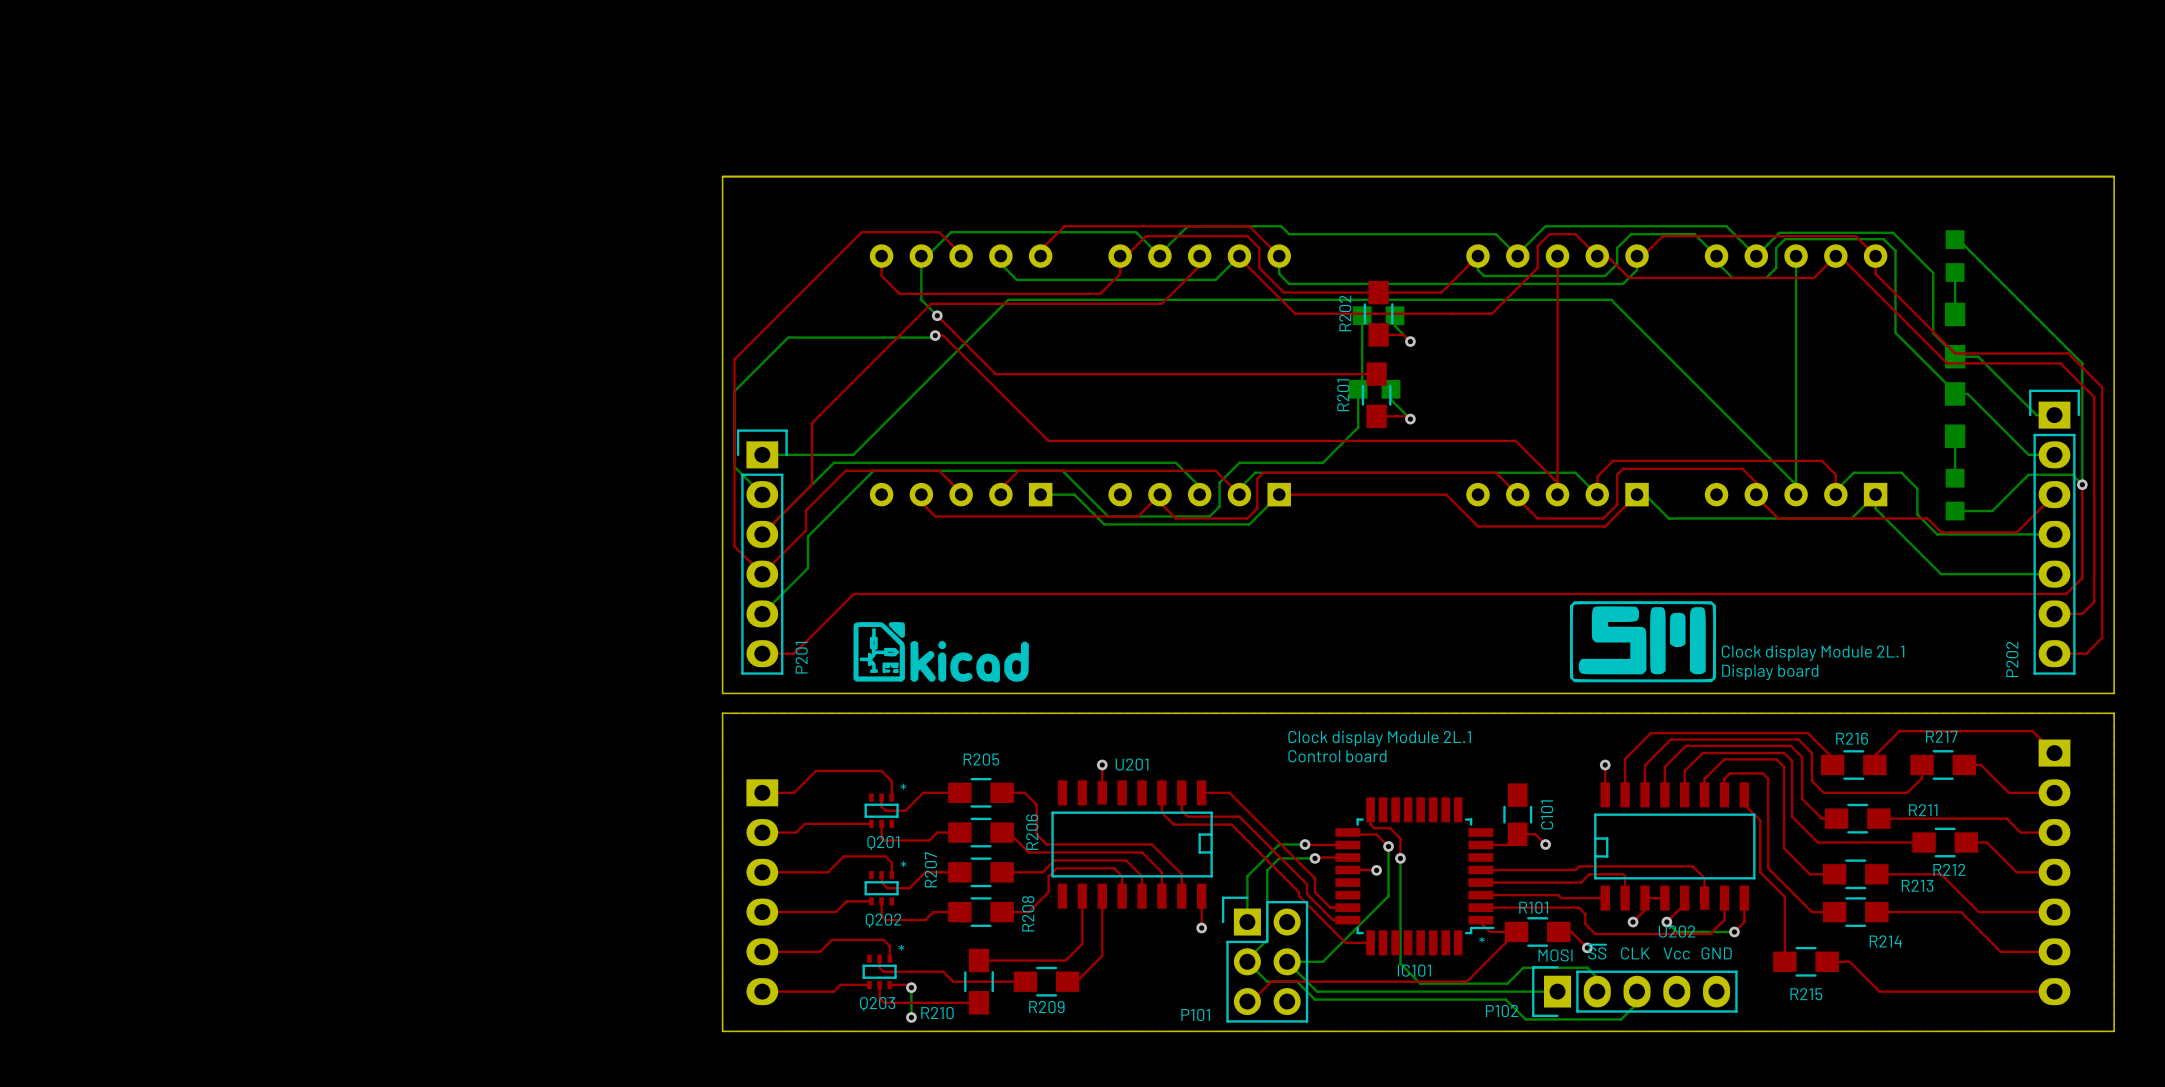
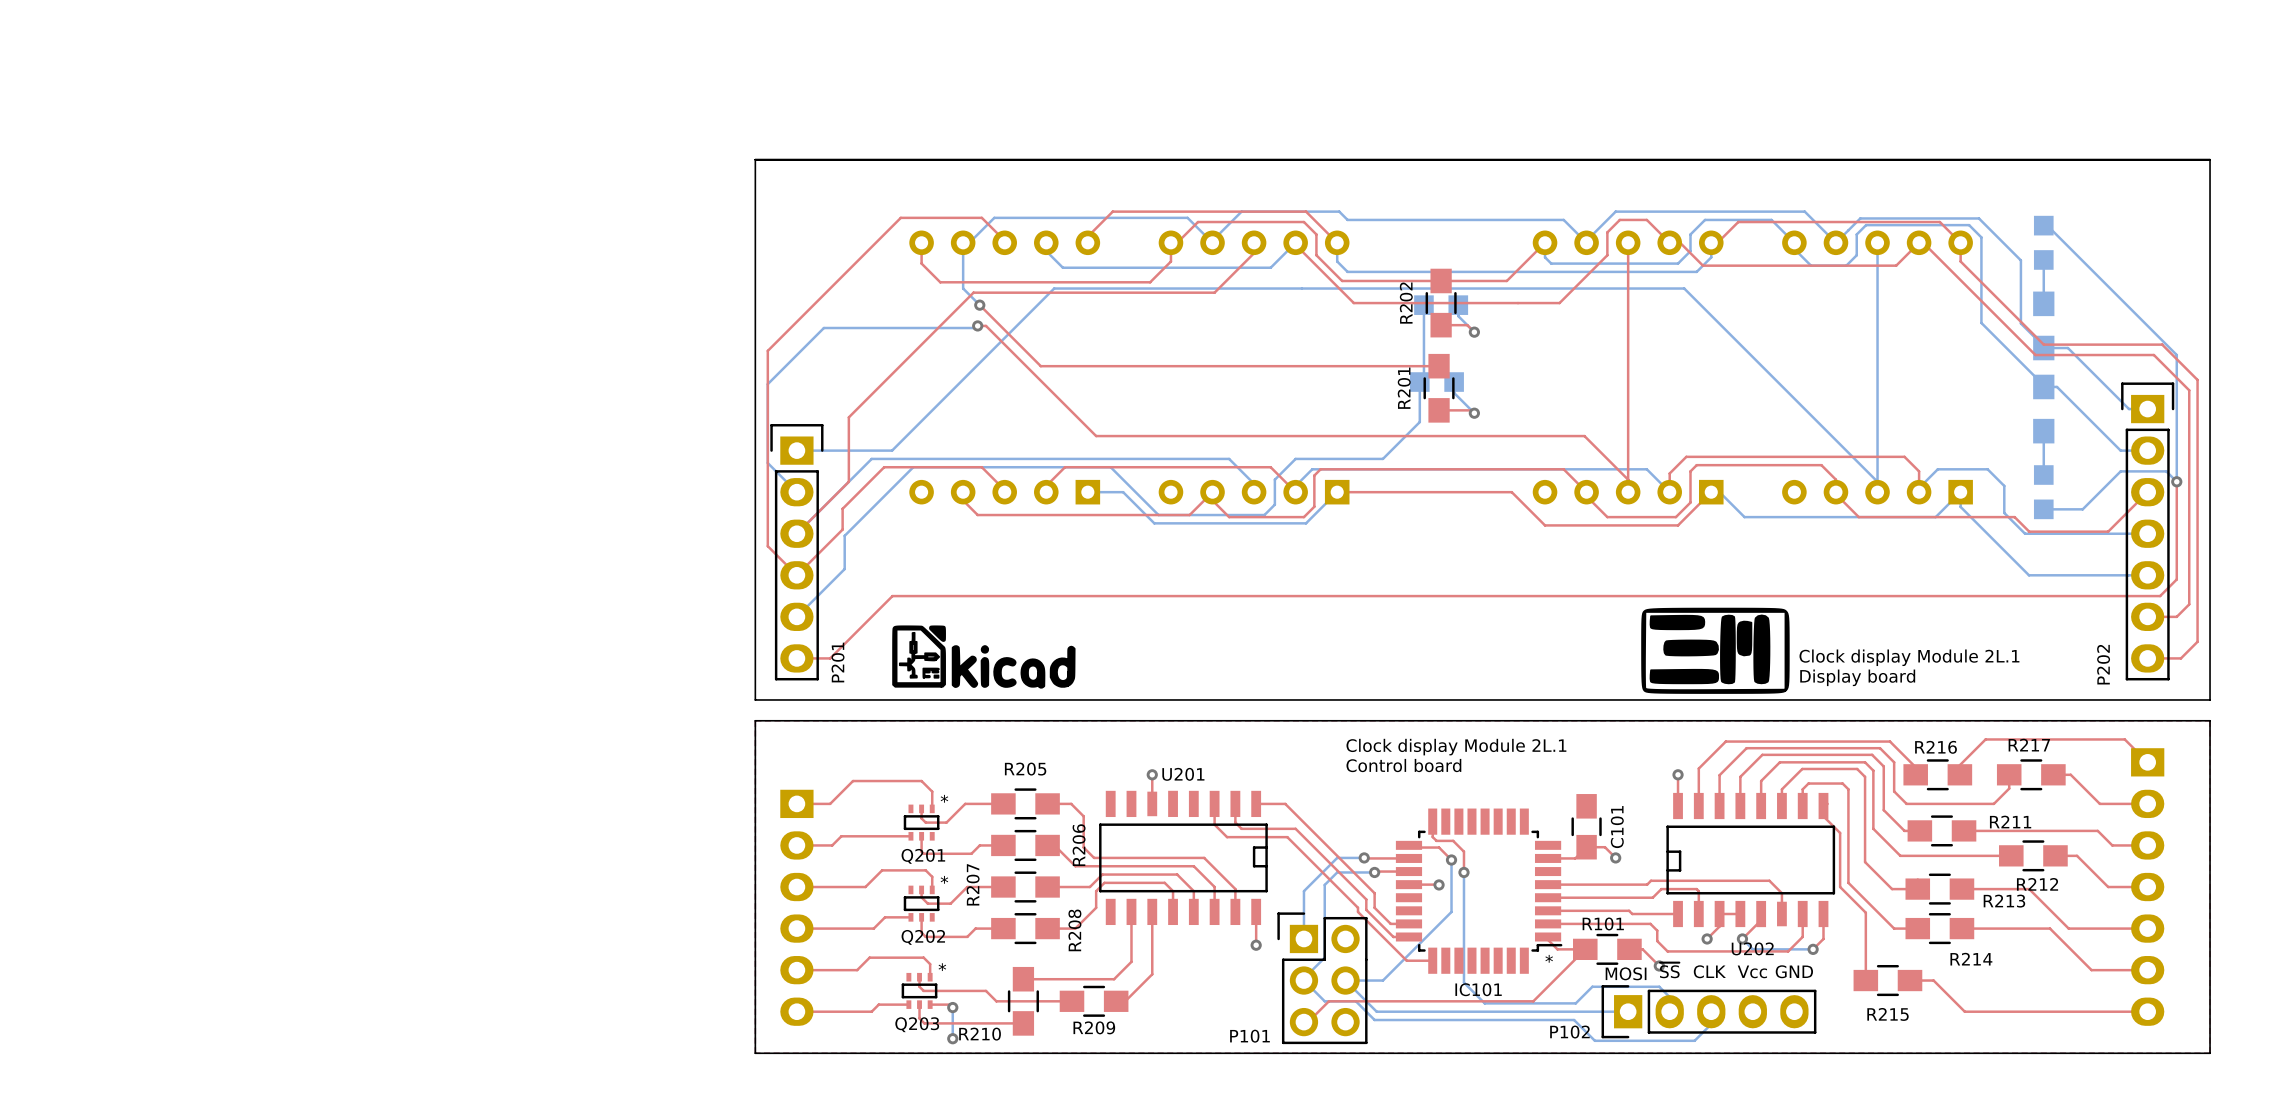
drawing shape: [1569, 601, 1717, 683] -> [1641, 607, 1790, 694]

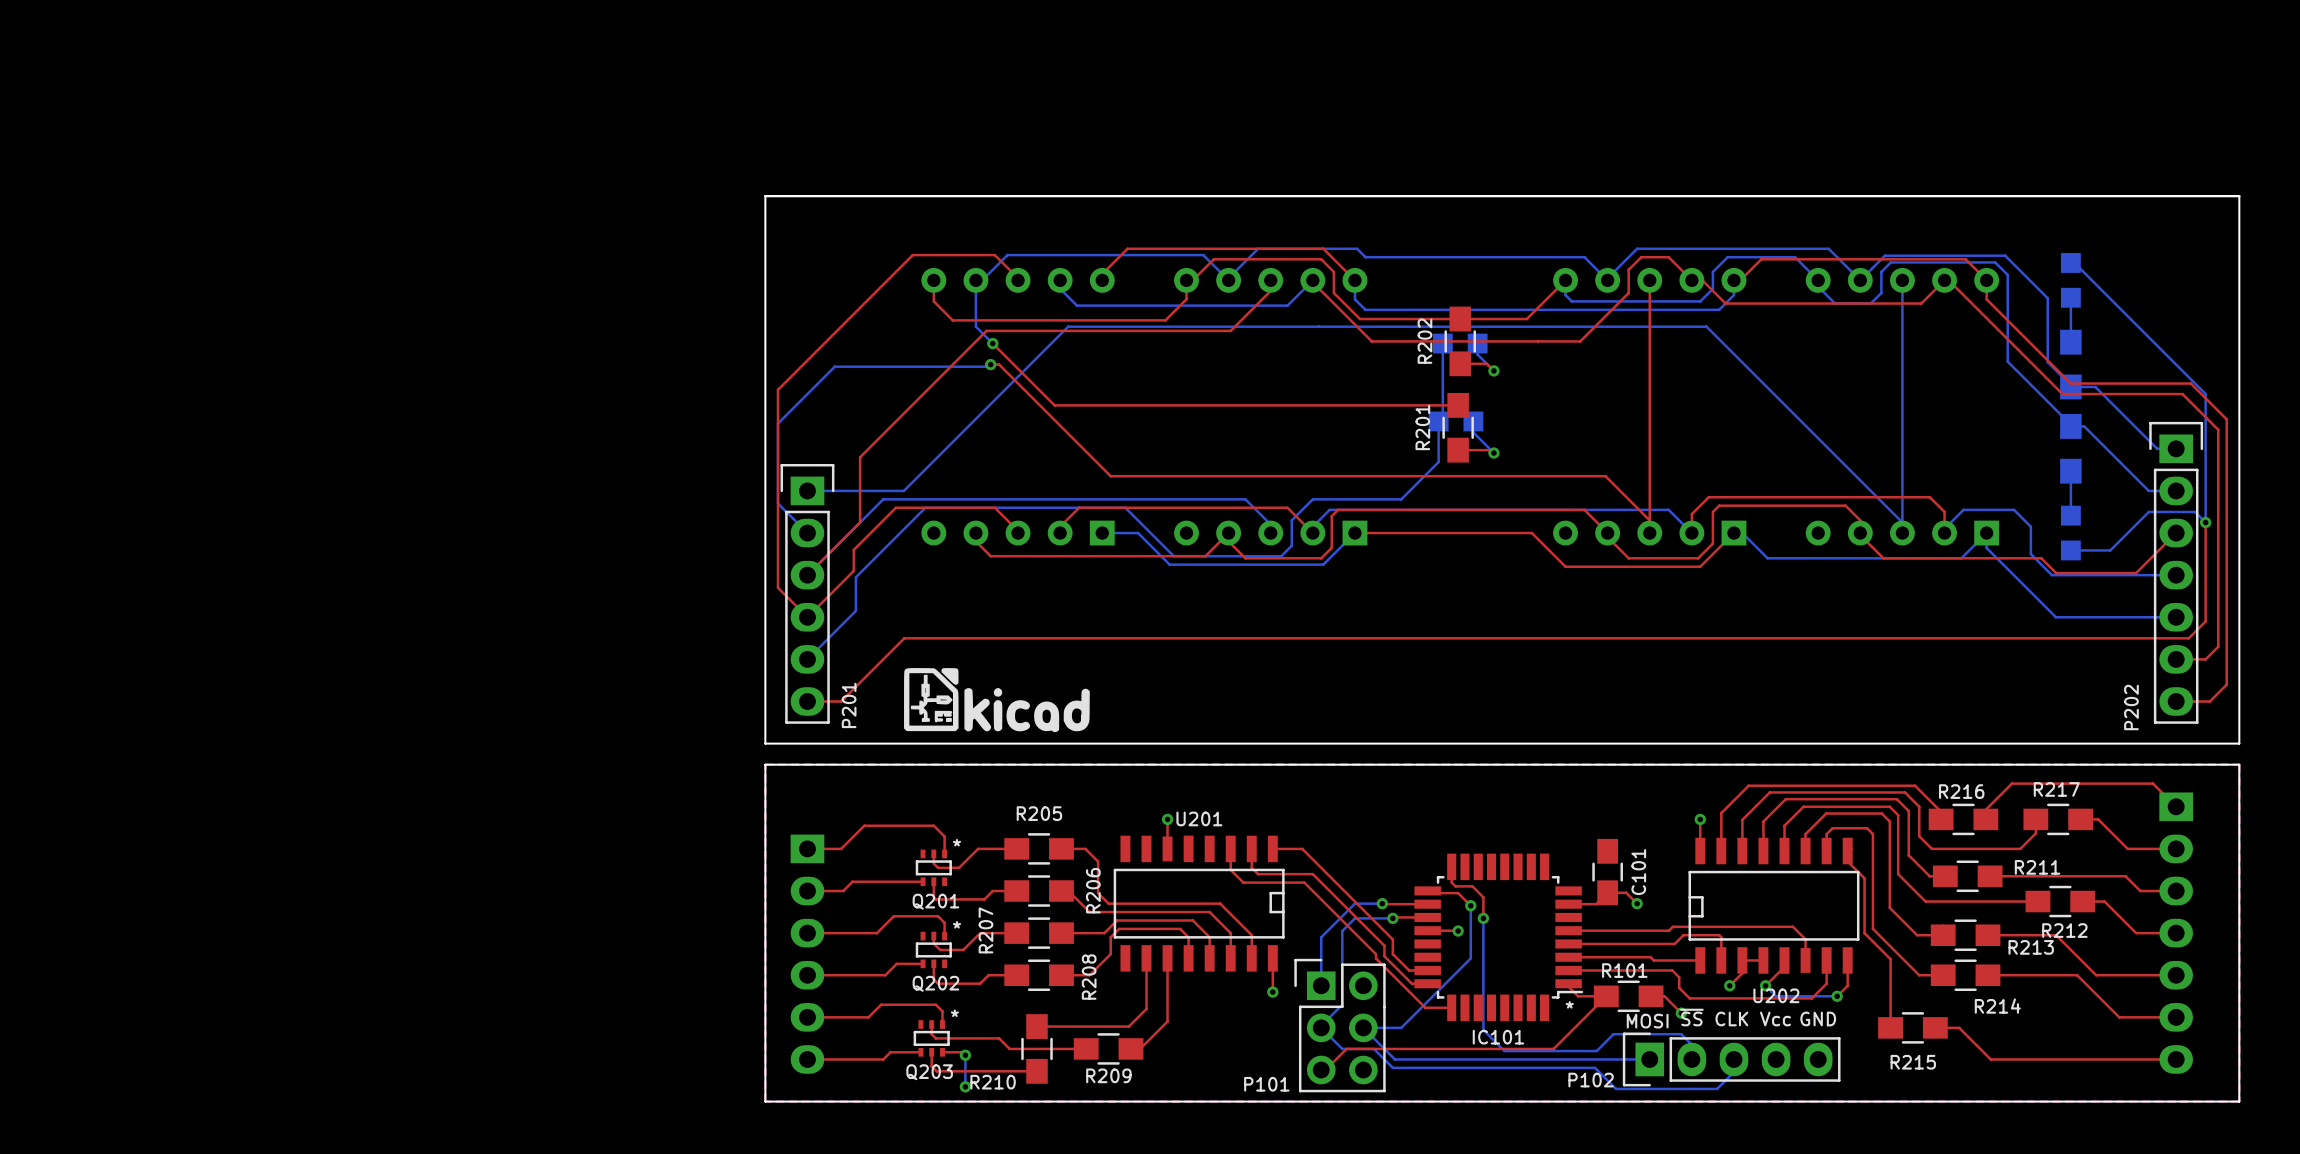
drawing: [1641, 607, 1790, 694] -> none
text: Clock display Module 2L.1 (1909, 657) -> none
text: Display board (1857, 677) -> none
text: Clock display Module 2L.1 (1456, 747) -> none
text: Control board (1403, 765) -> none

